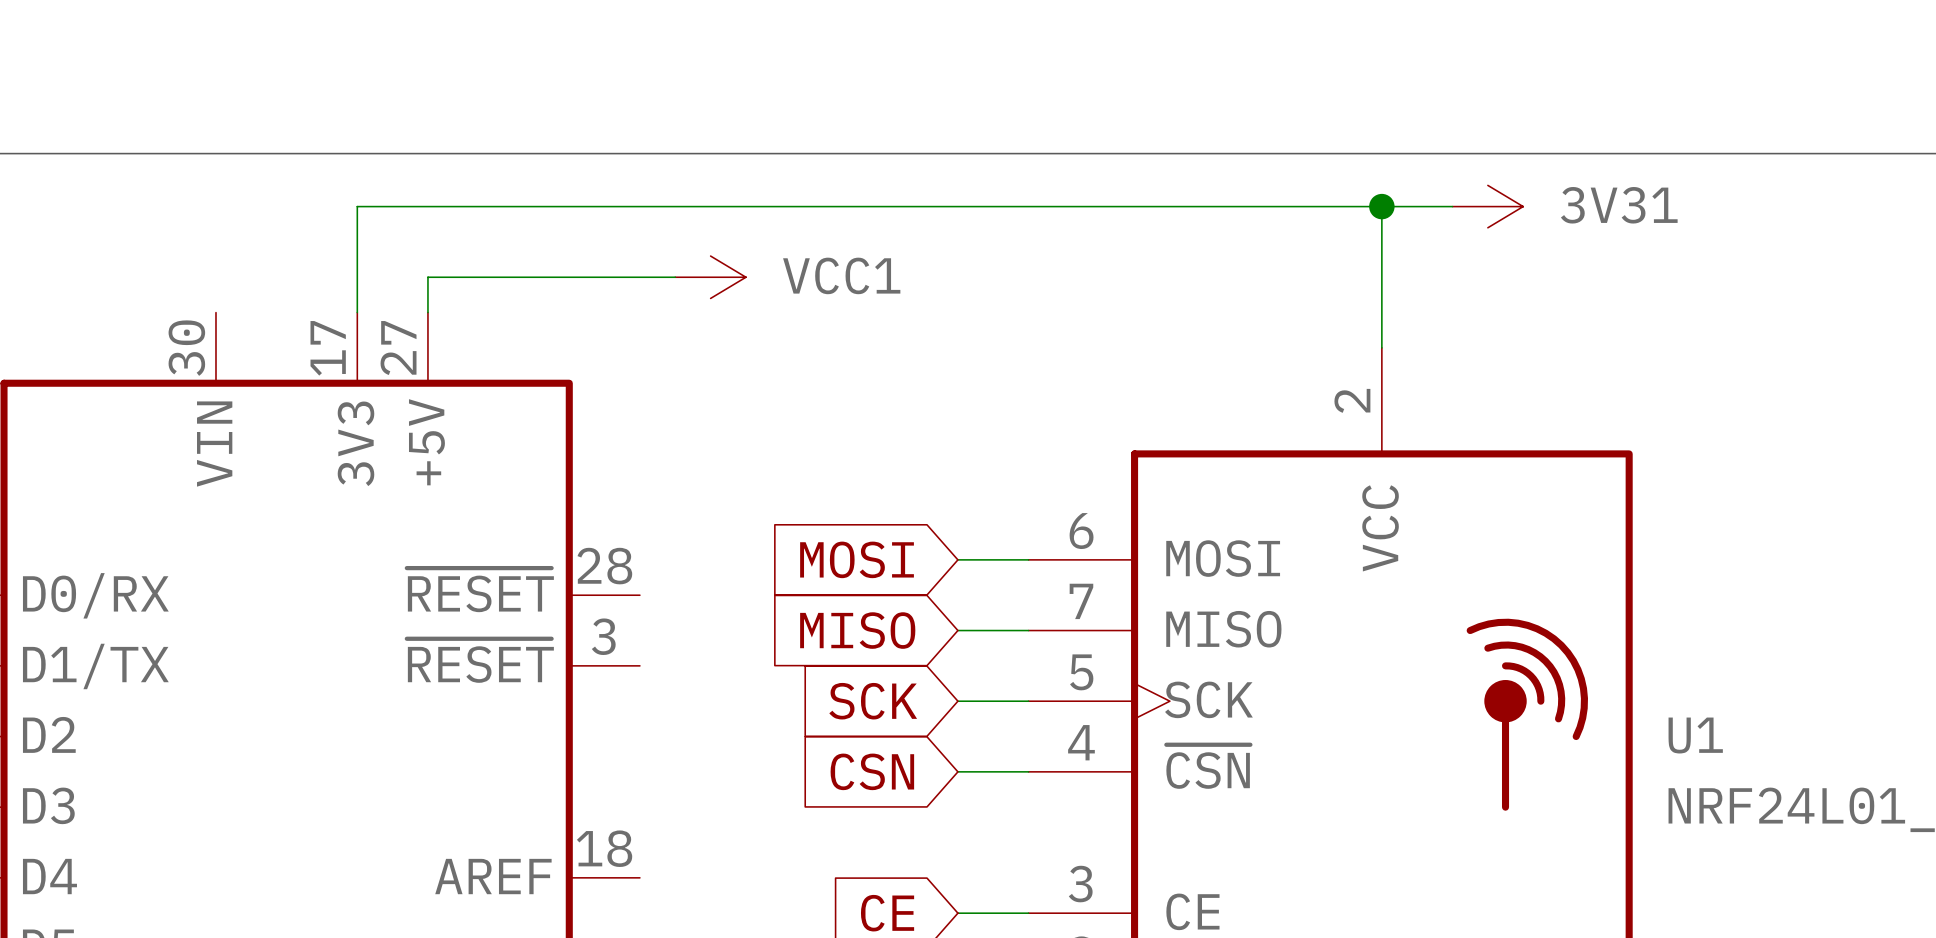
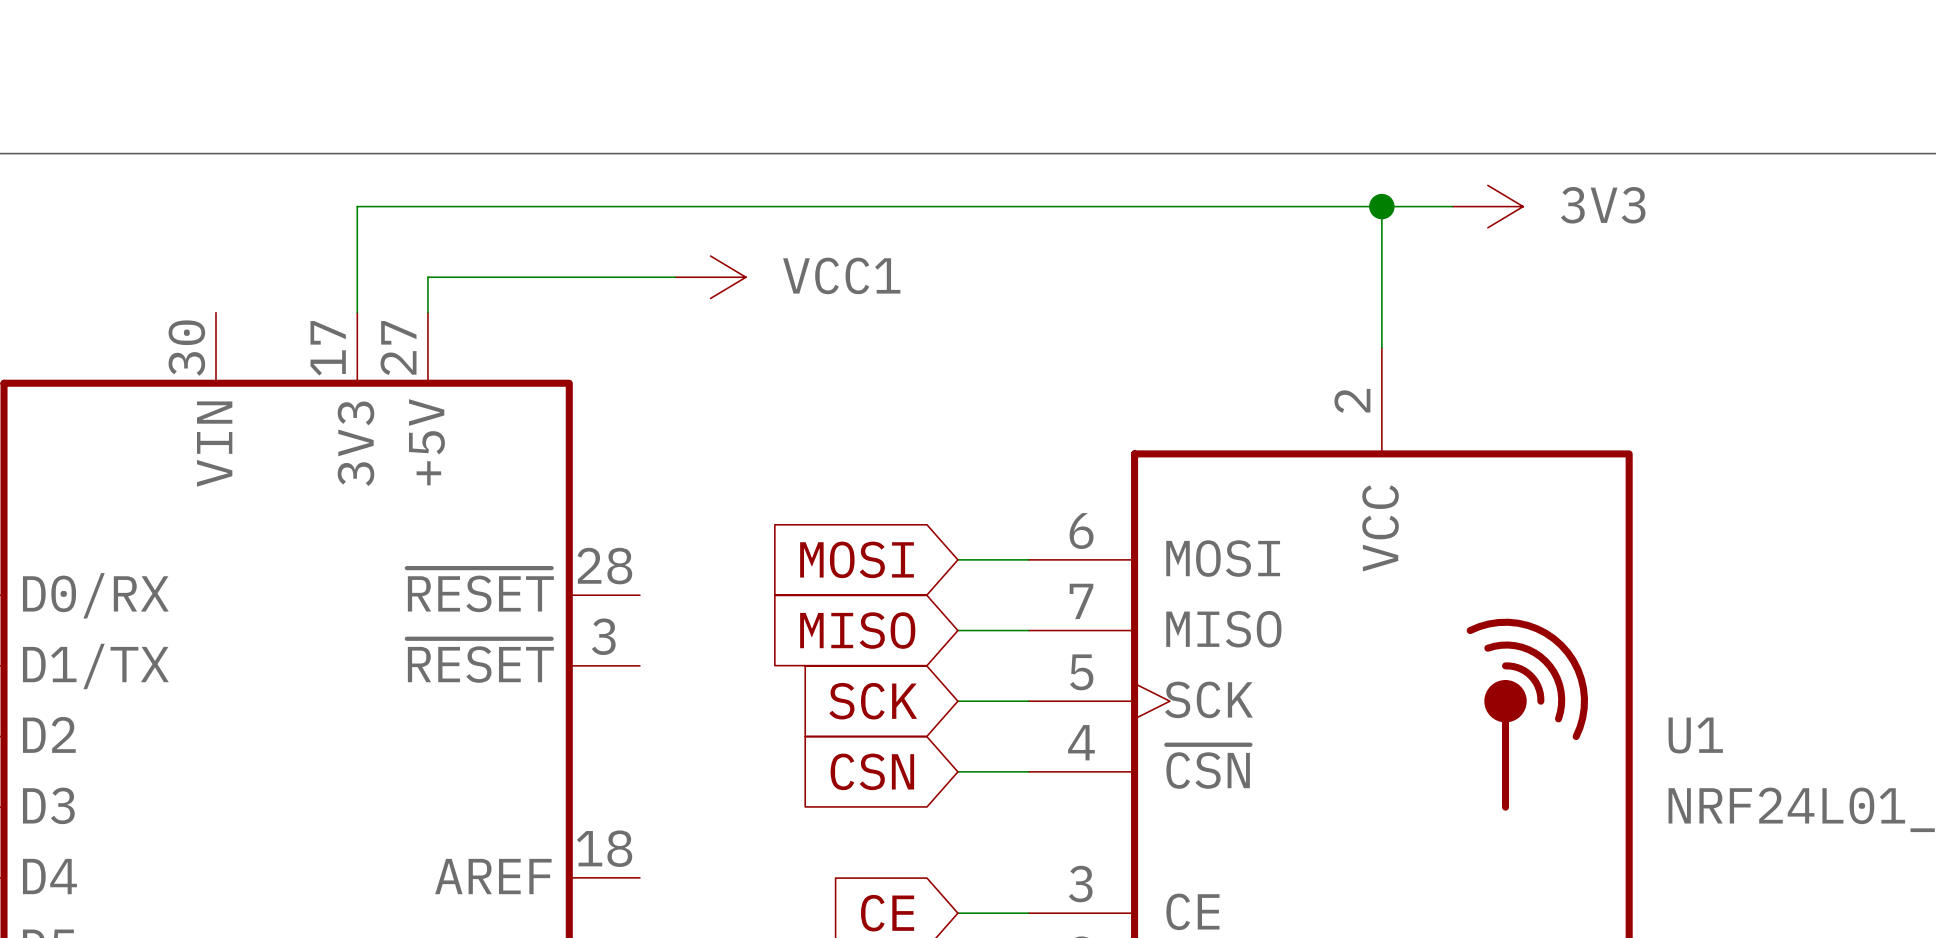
power symbol: 3V31 (1487, 206) -> 3V3 (1487, 206)

